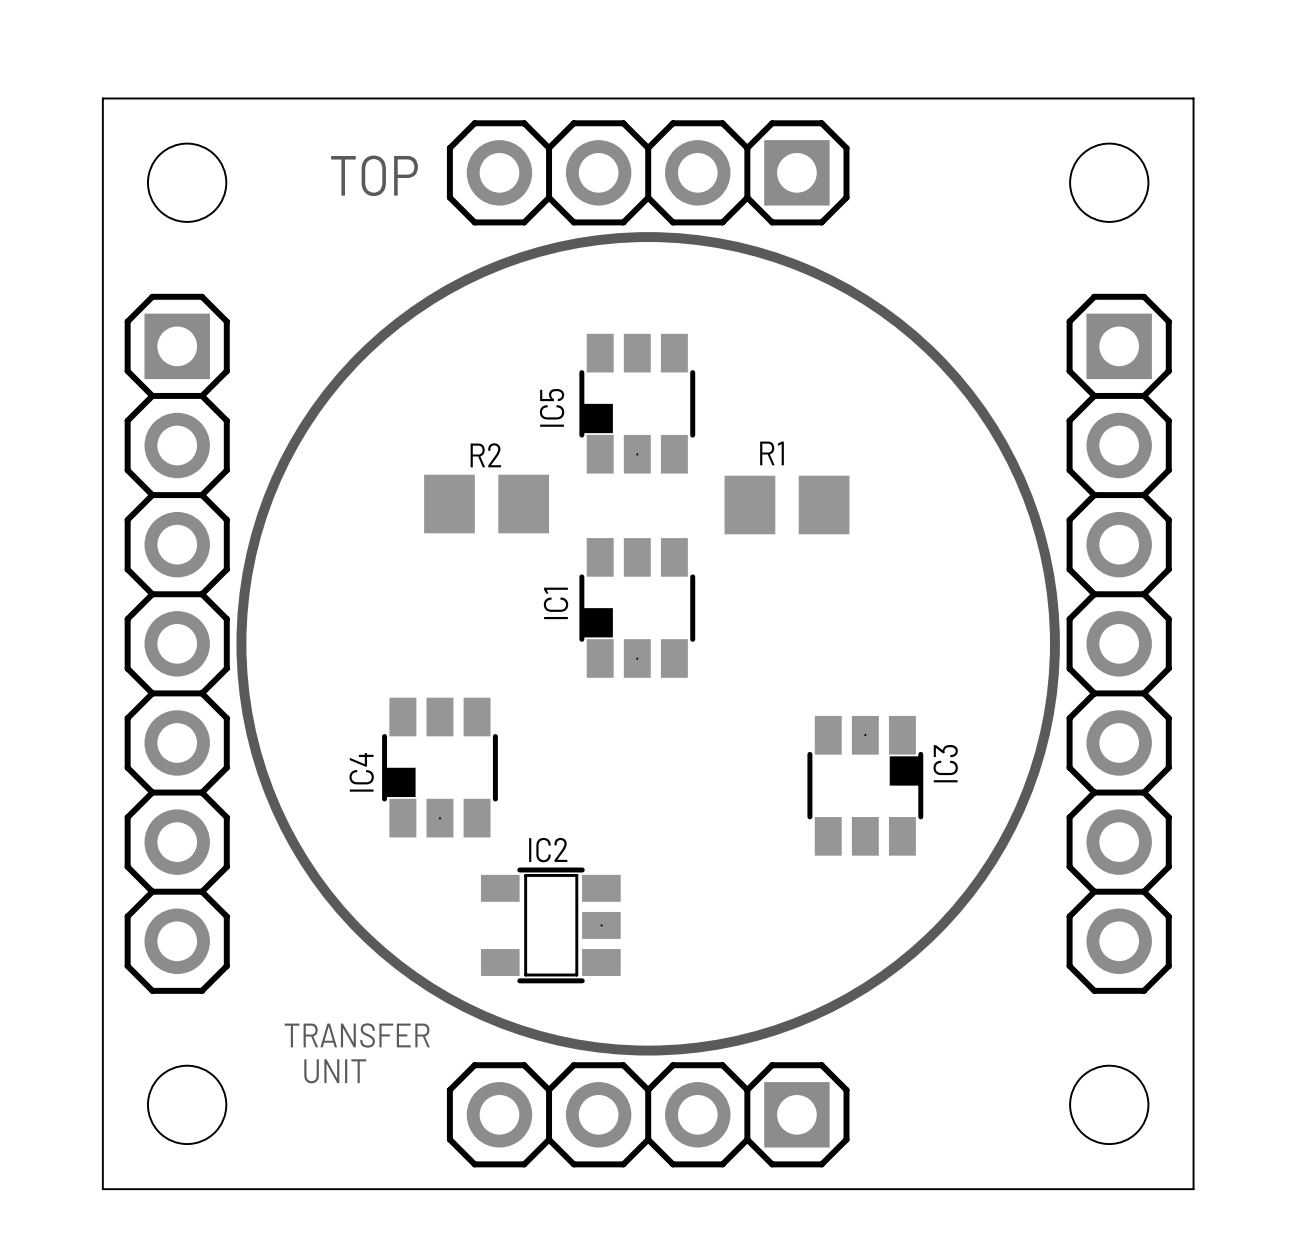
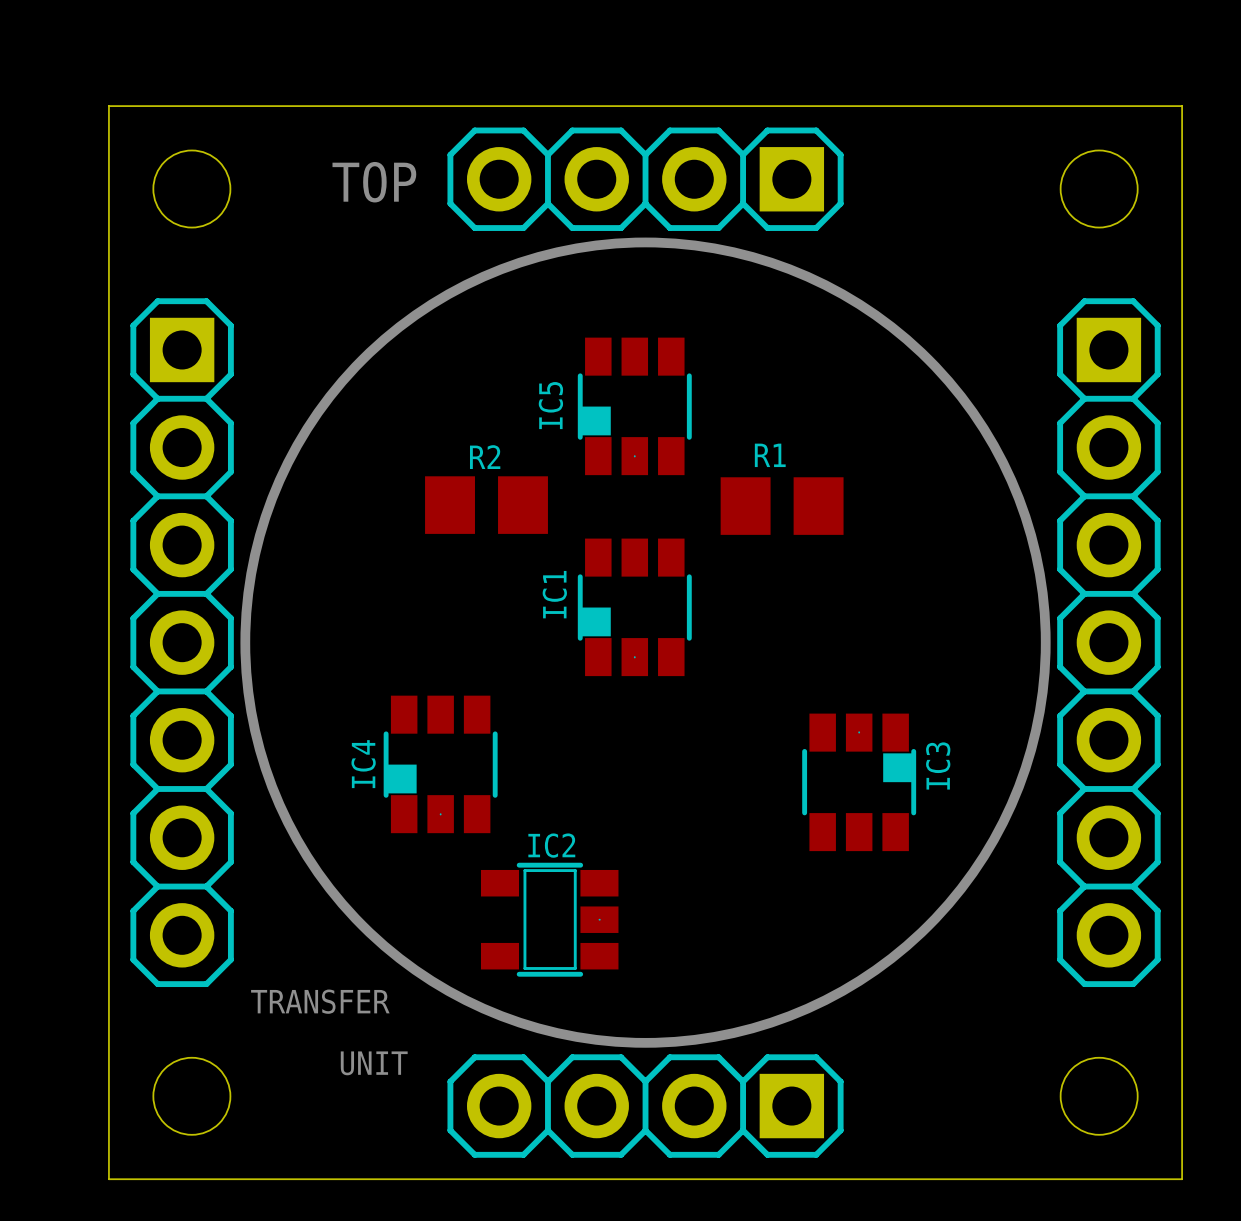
text position: TRANSFER (357, 1035) -> TRANSFER (320, 1001)

